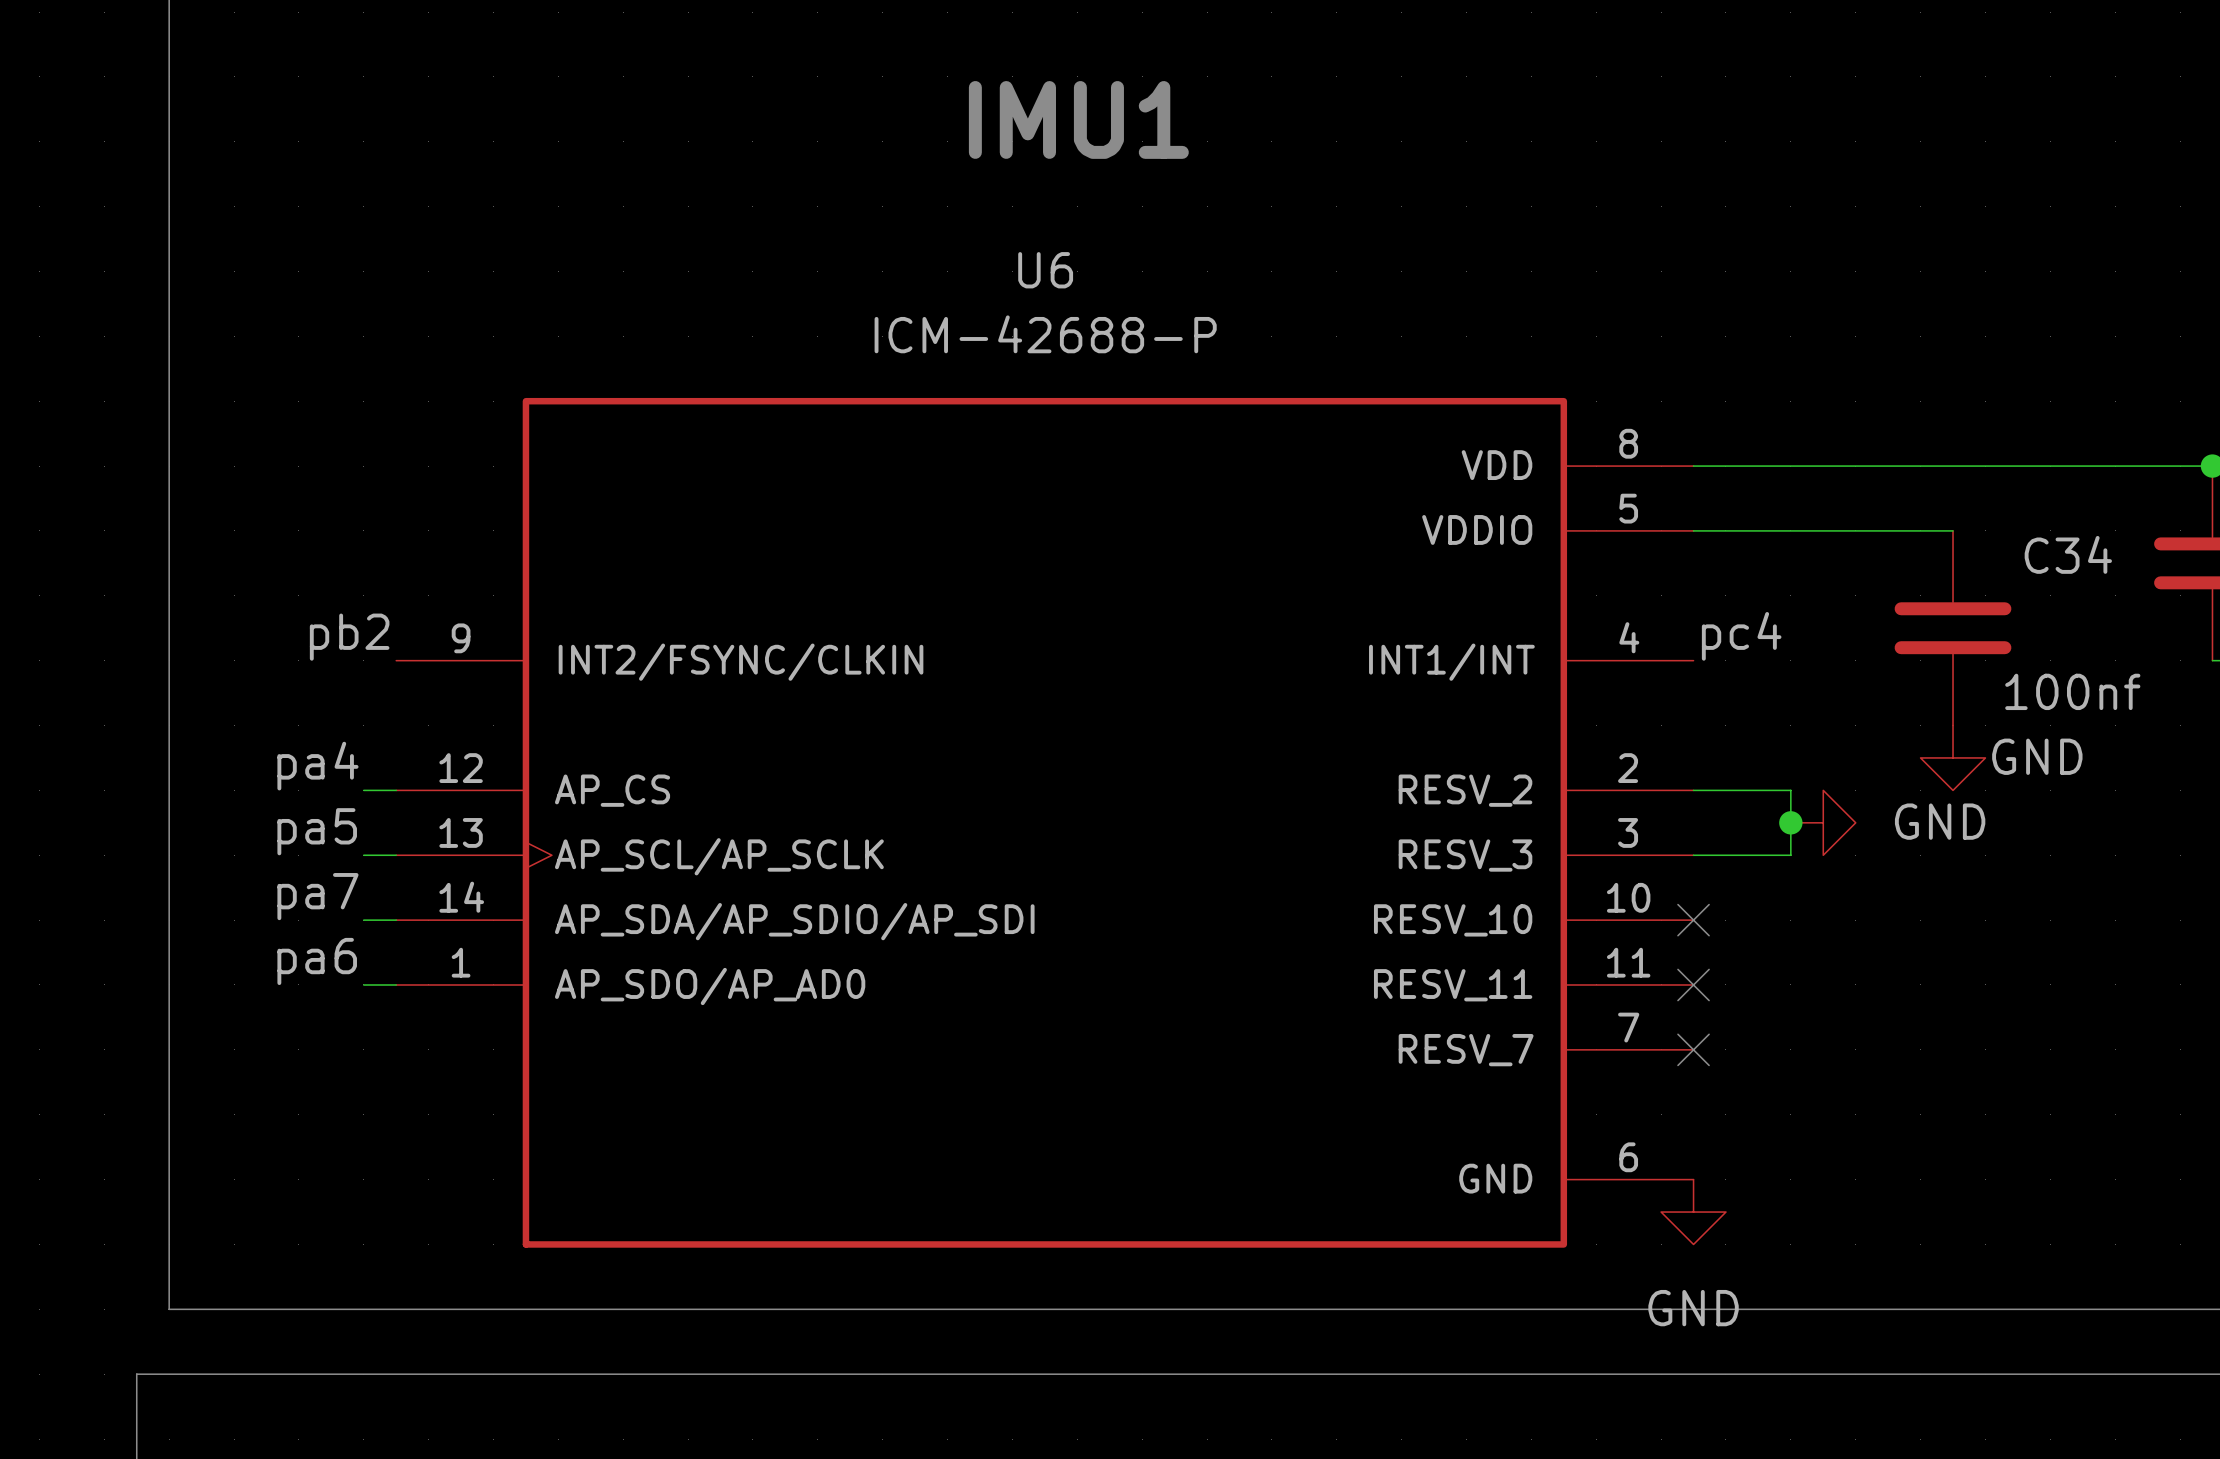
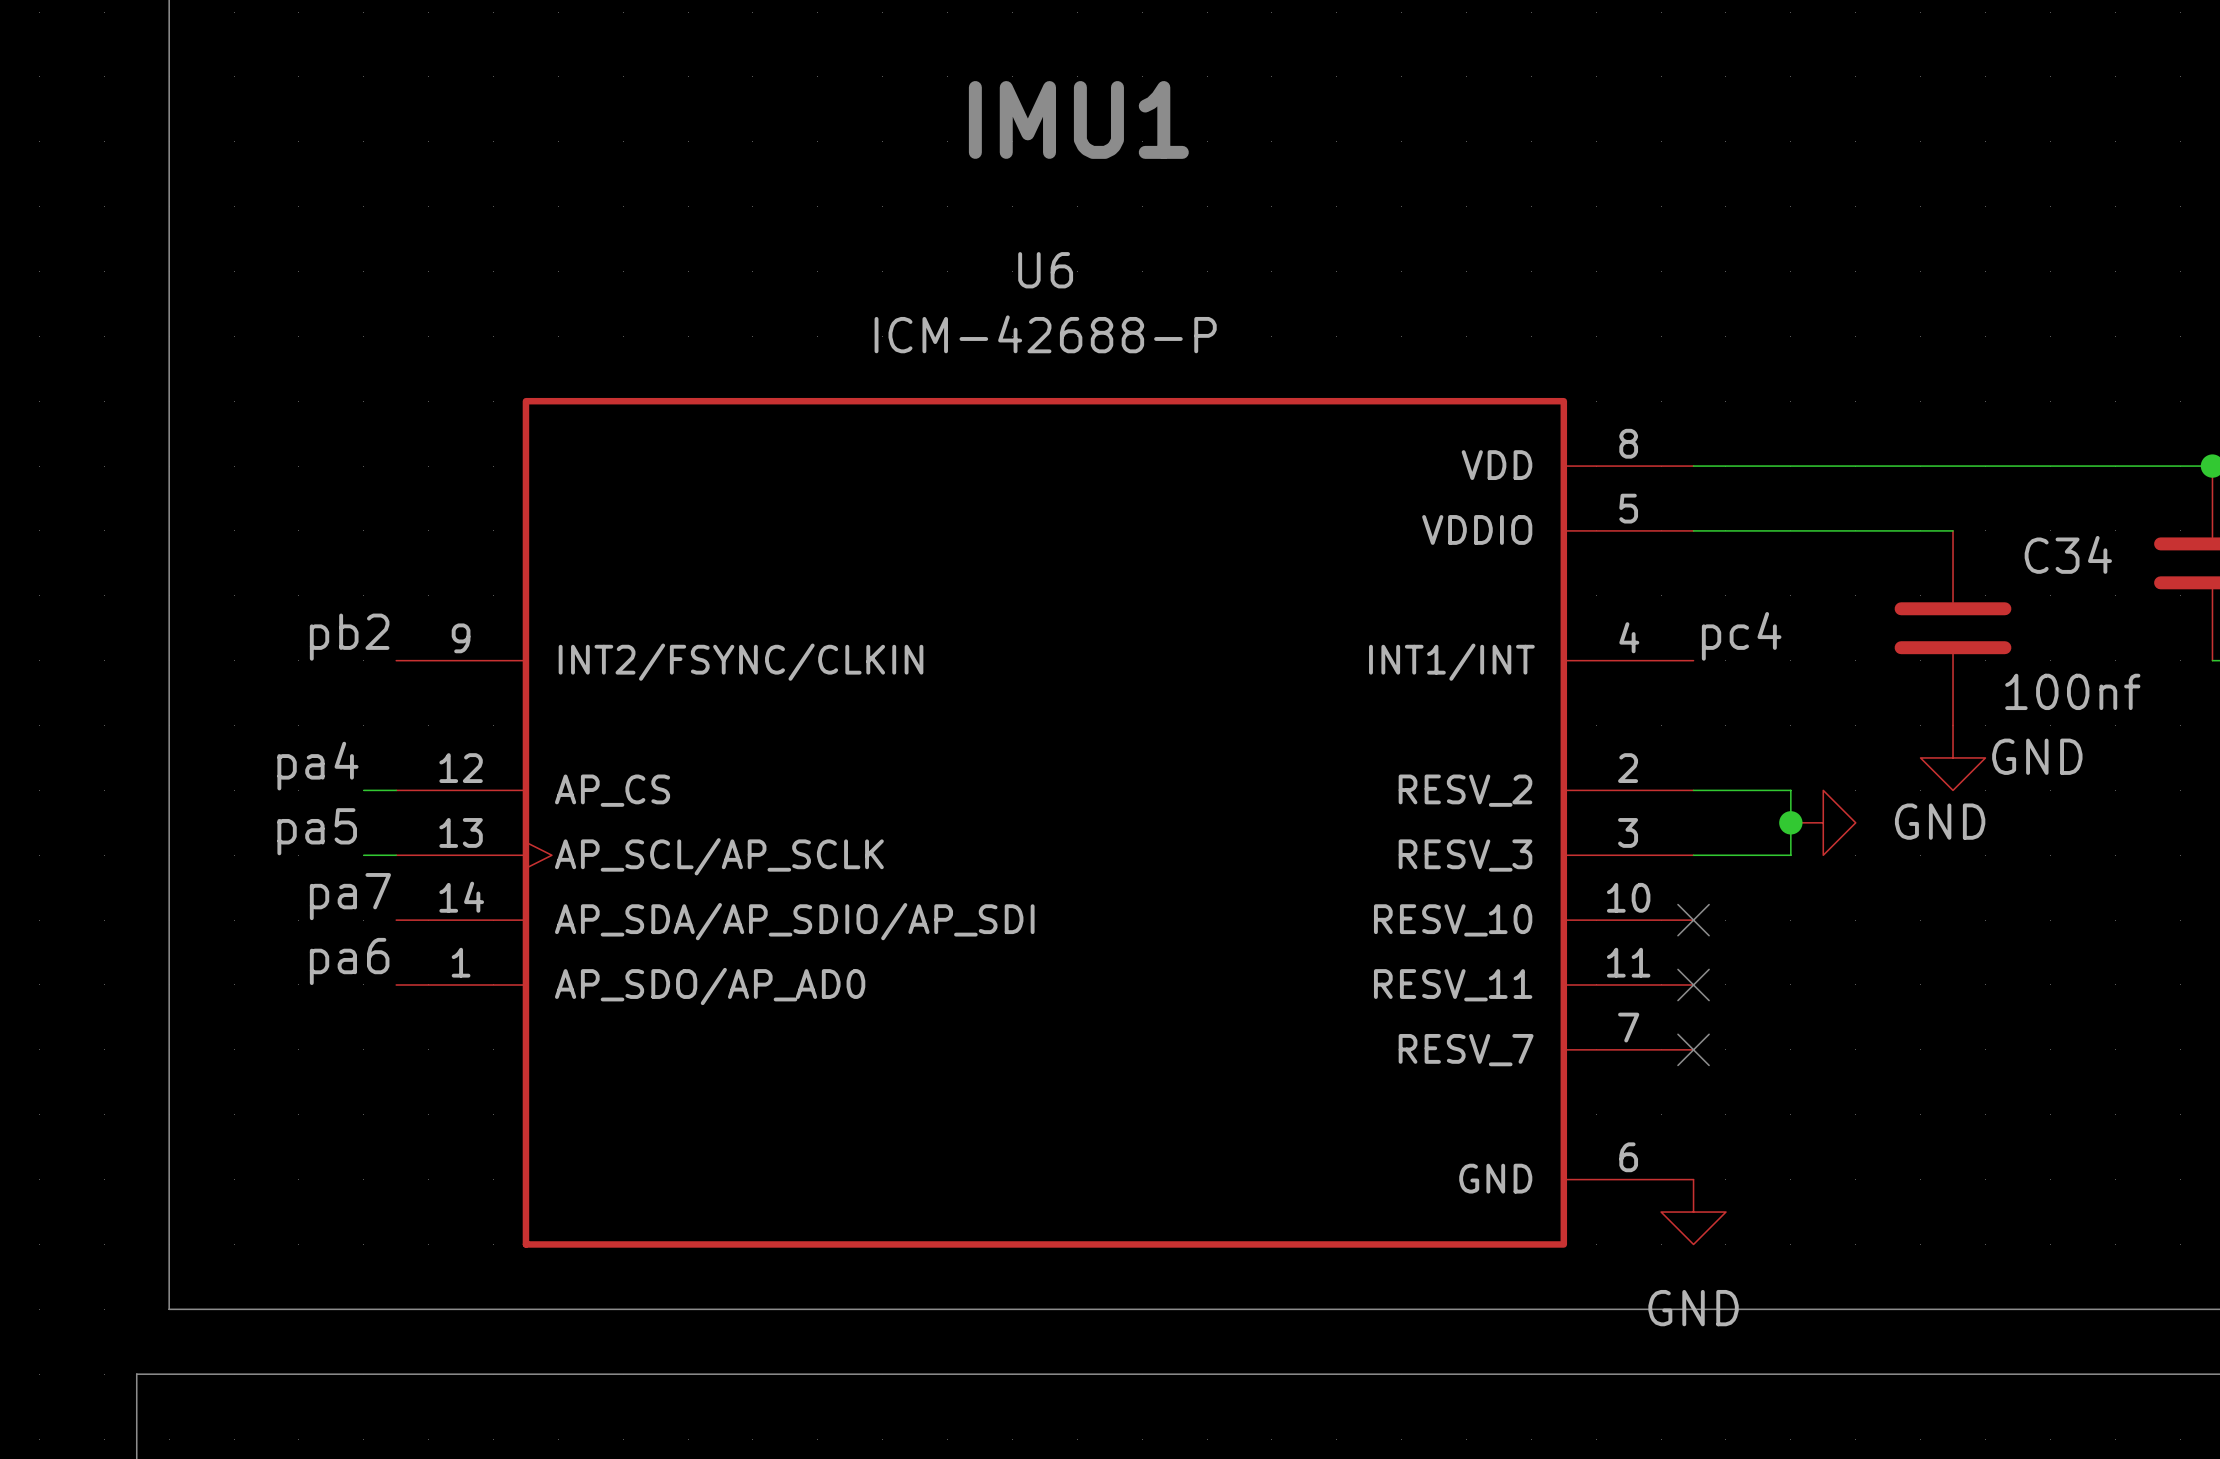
label position: pa7 (317, 896) -> pa7 (350, 896)
wire: (363, 920) (396, 920) -> none
label position: pa6 (317, 961) -> pa6 (349, 961)
wire: (363, 984) (396, 984) -> none

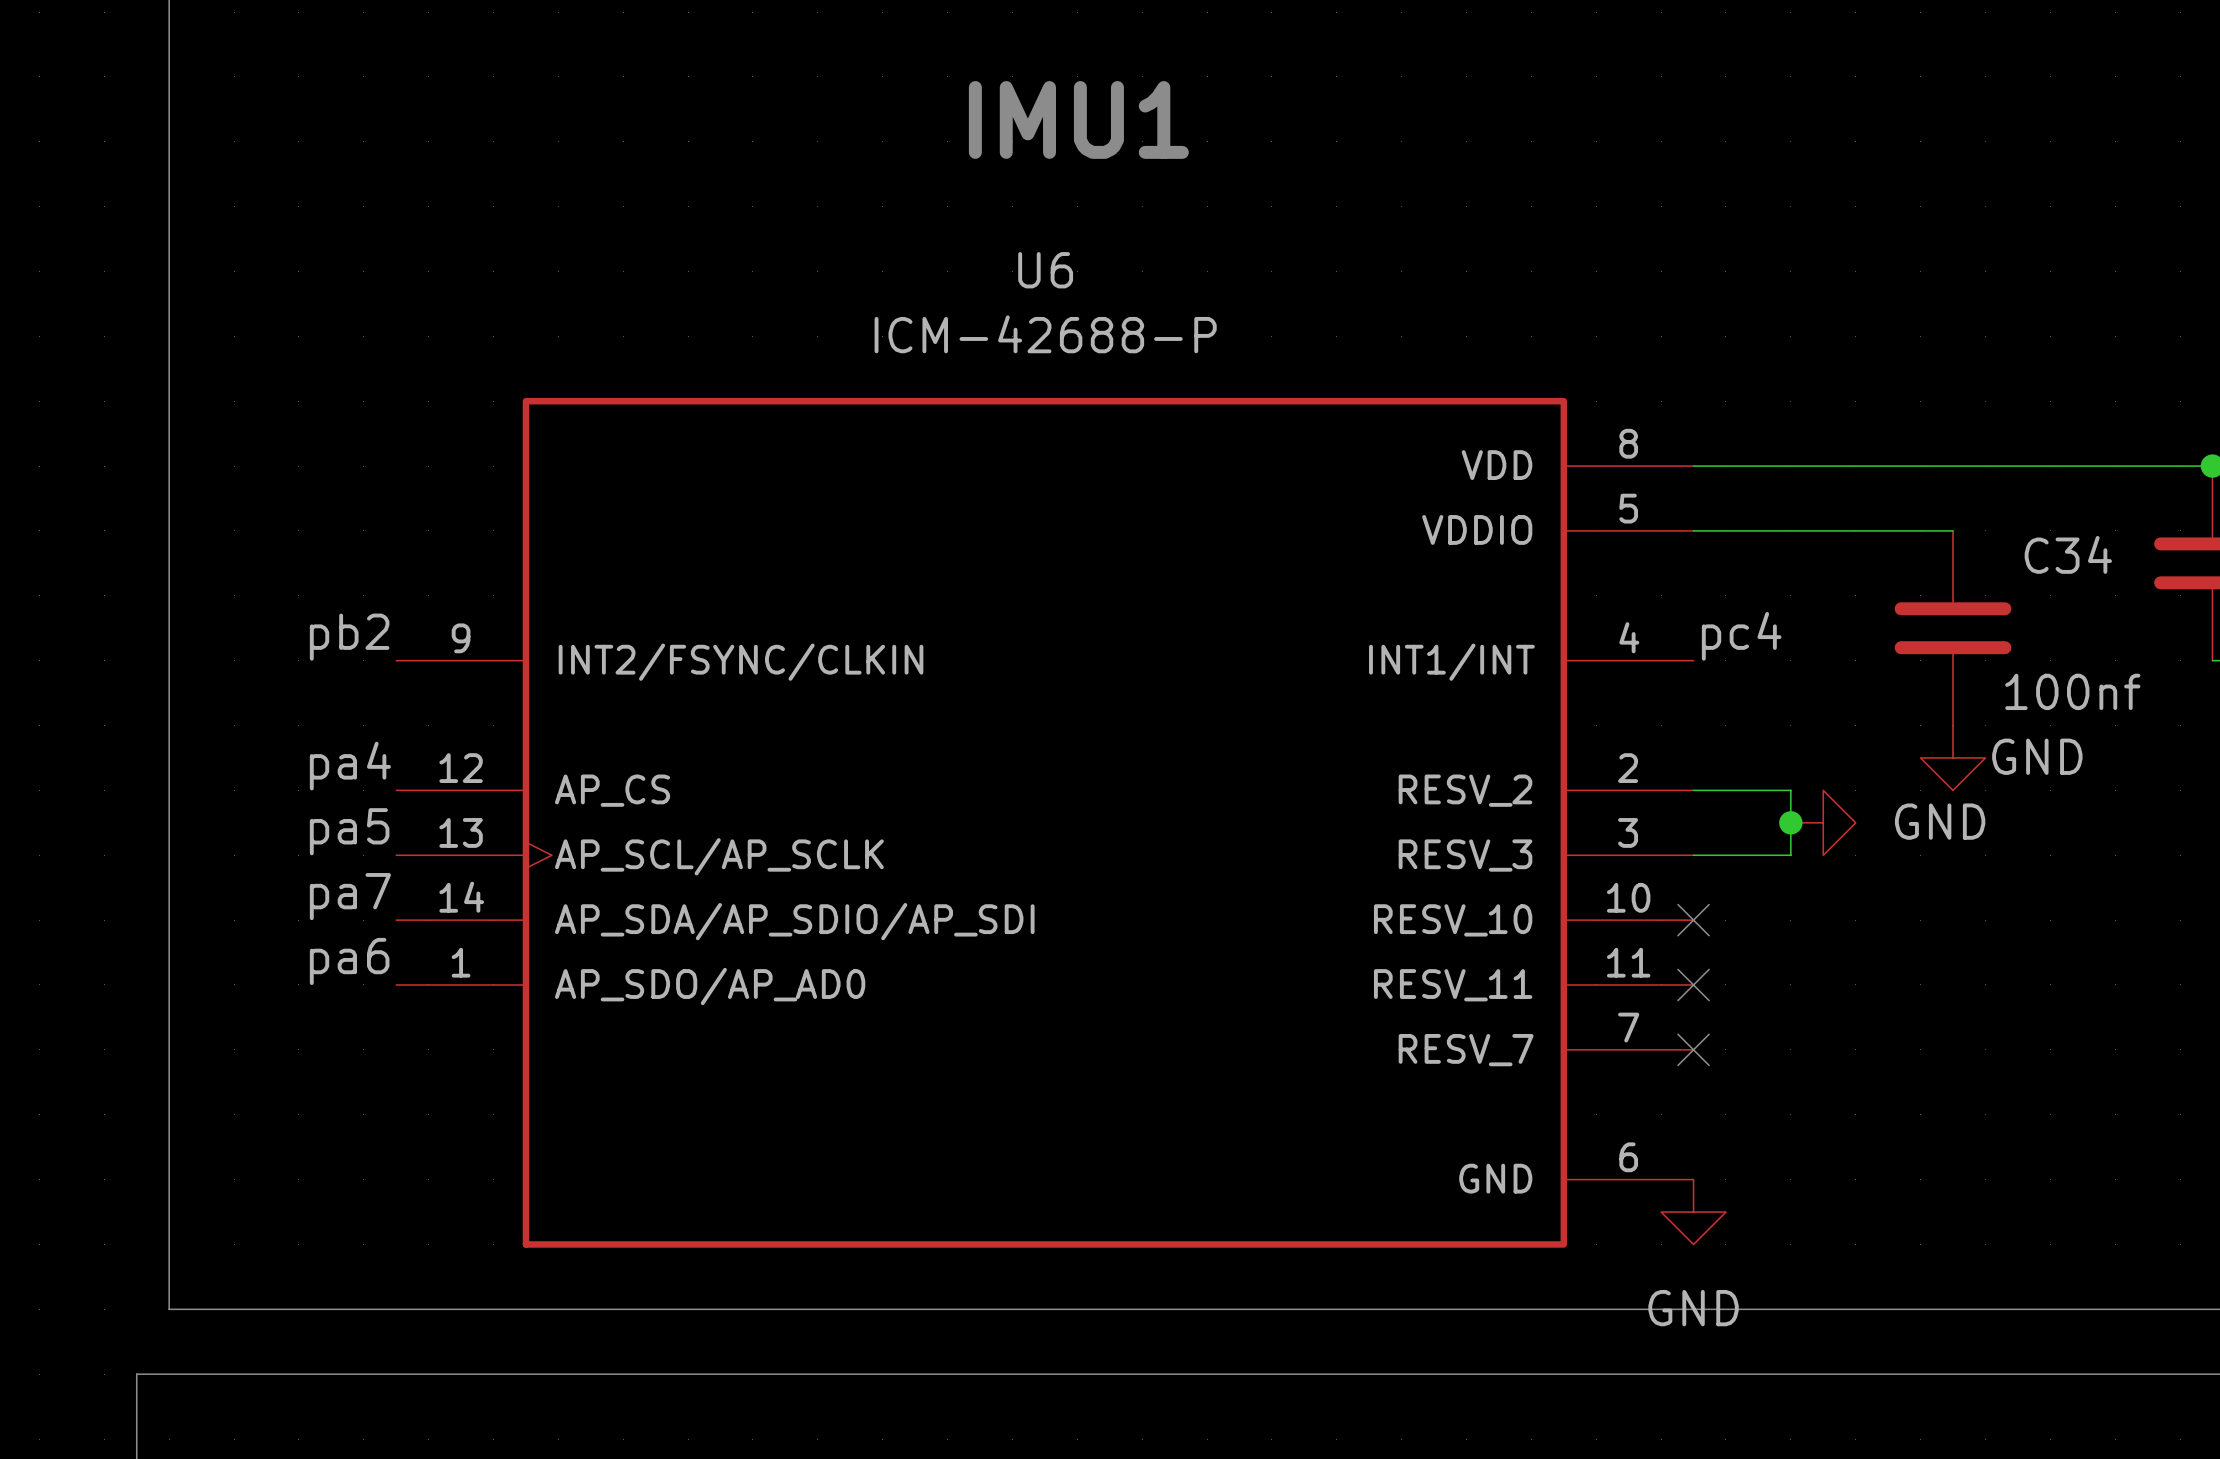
label position: pa4 (317, 766) -> pa4 (350, 766)
wire: (363, 790) (396, 790) -> none
label position: pa5 (317, 831) -> pa5 (349, 831)
wire: (363, 855) (396, 855) -> none

